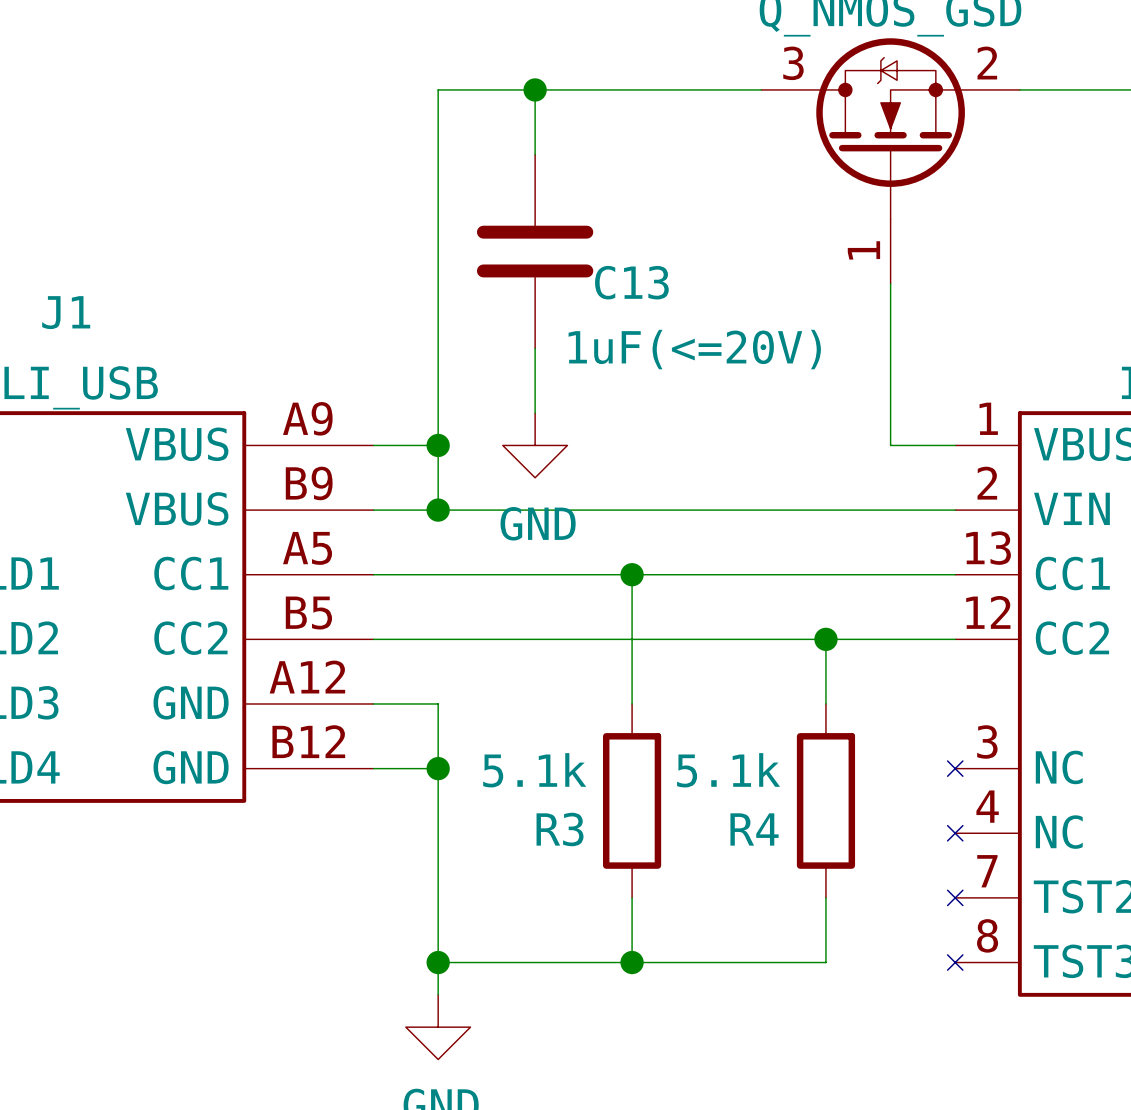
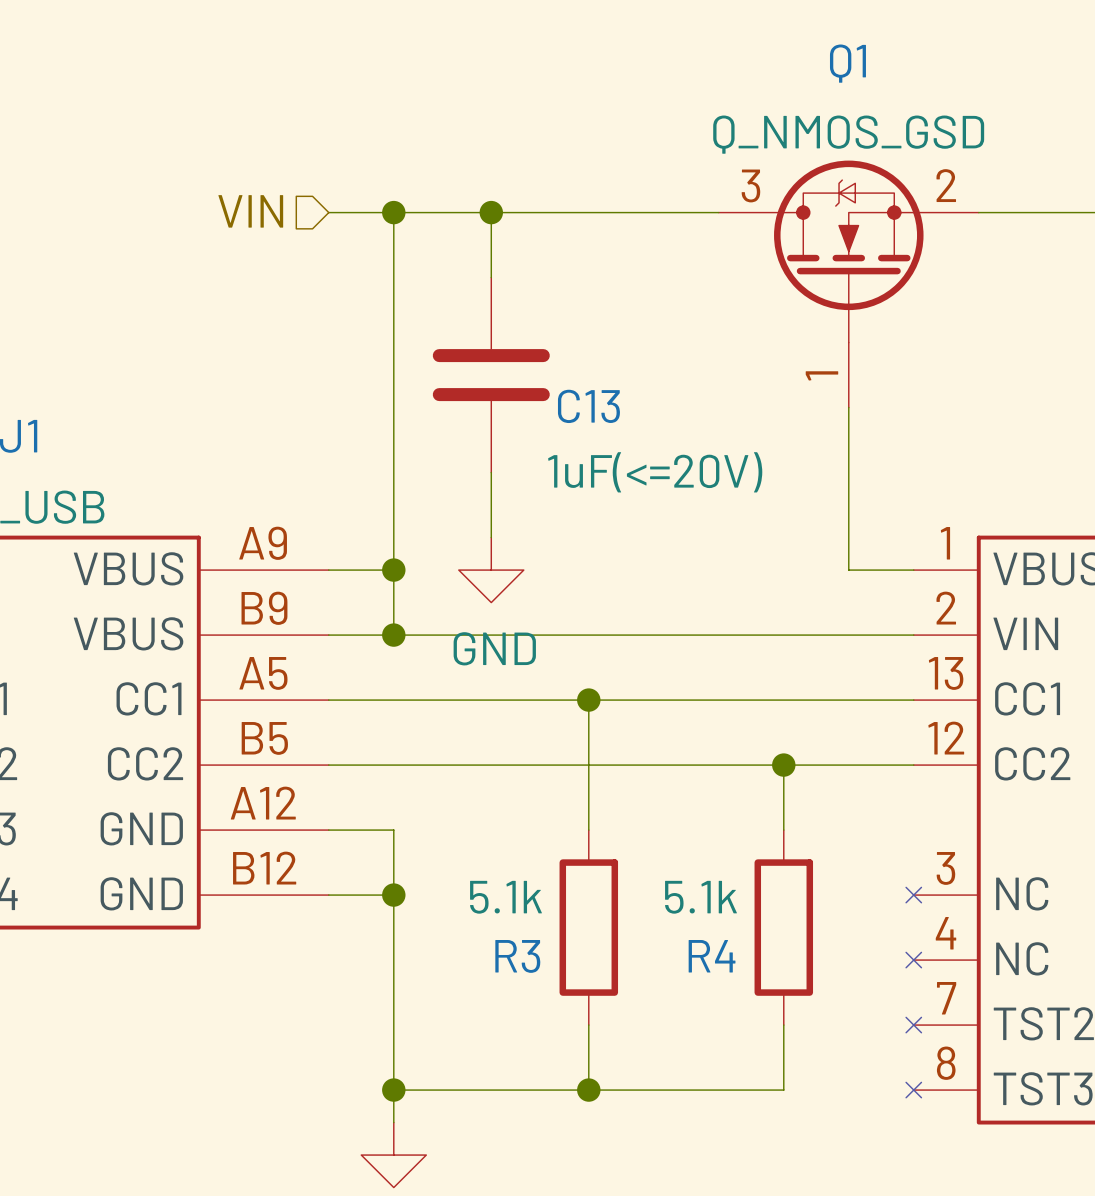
hierarchical label: none -> VIN (250, 211)
wire: none -> (328, 212) (393, 212)
junction: none -> (393, 212)

